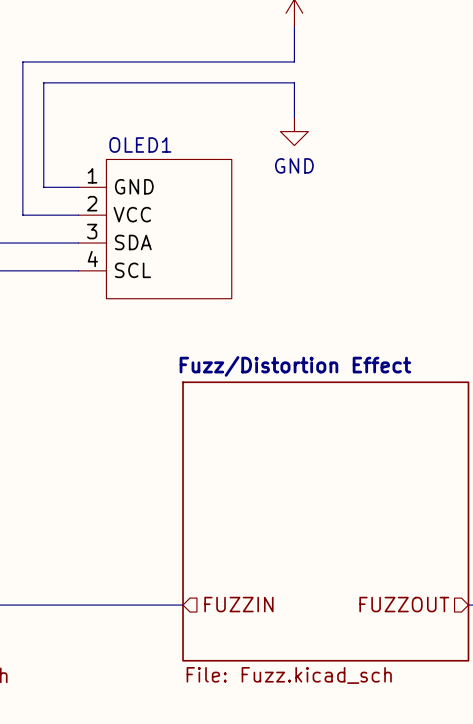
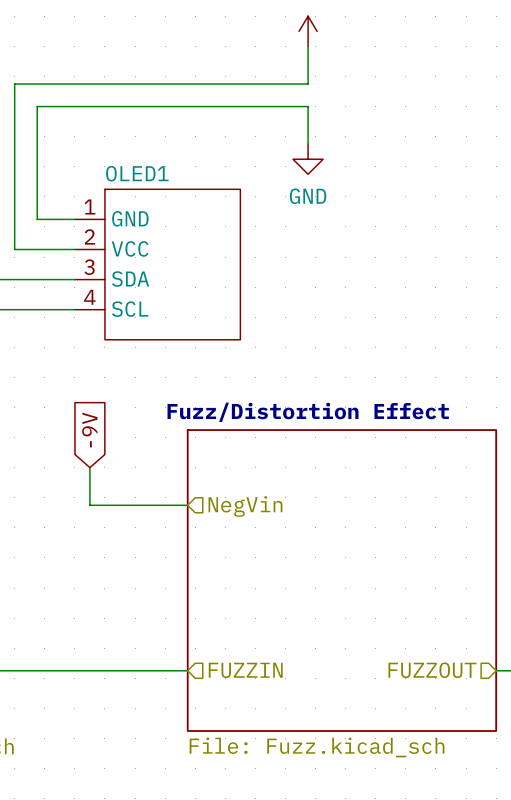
global label: none -> -9V (89, 430)
wire: none -> (89, 467) (89, 505) (187, 505)
hierarchical label: none -> NegVin (245, 506)

